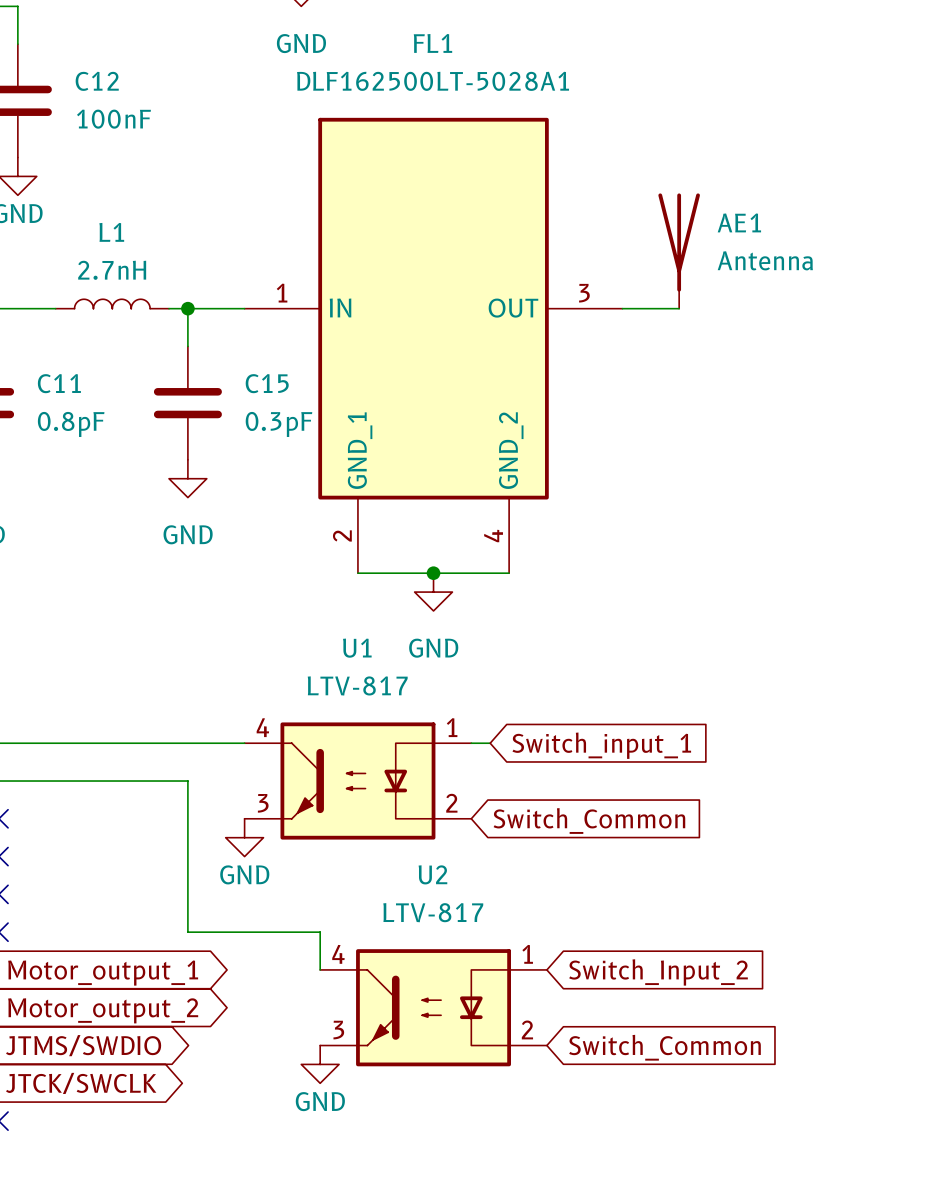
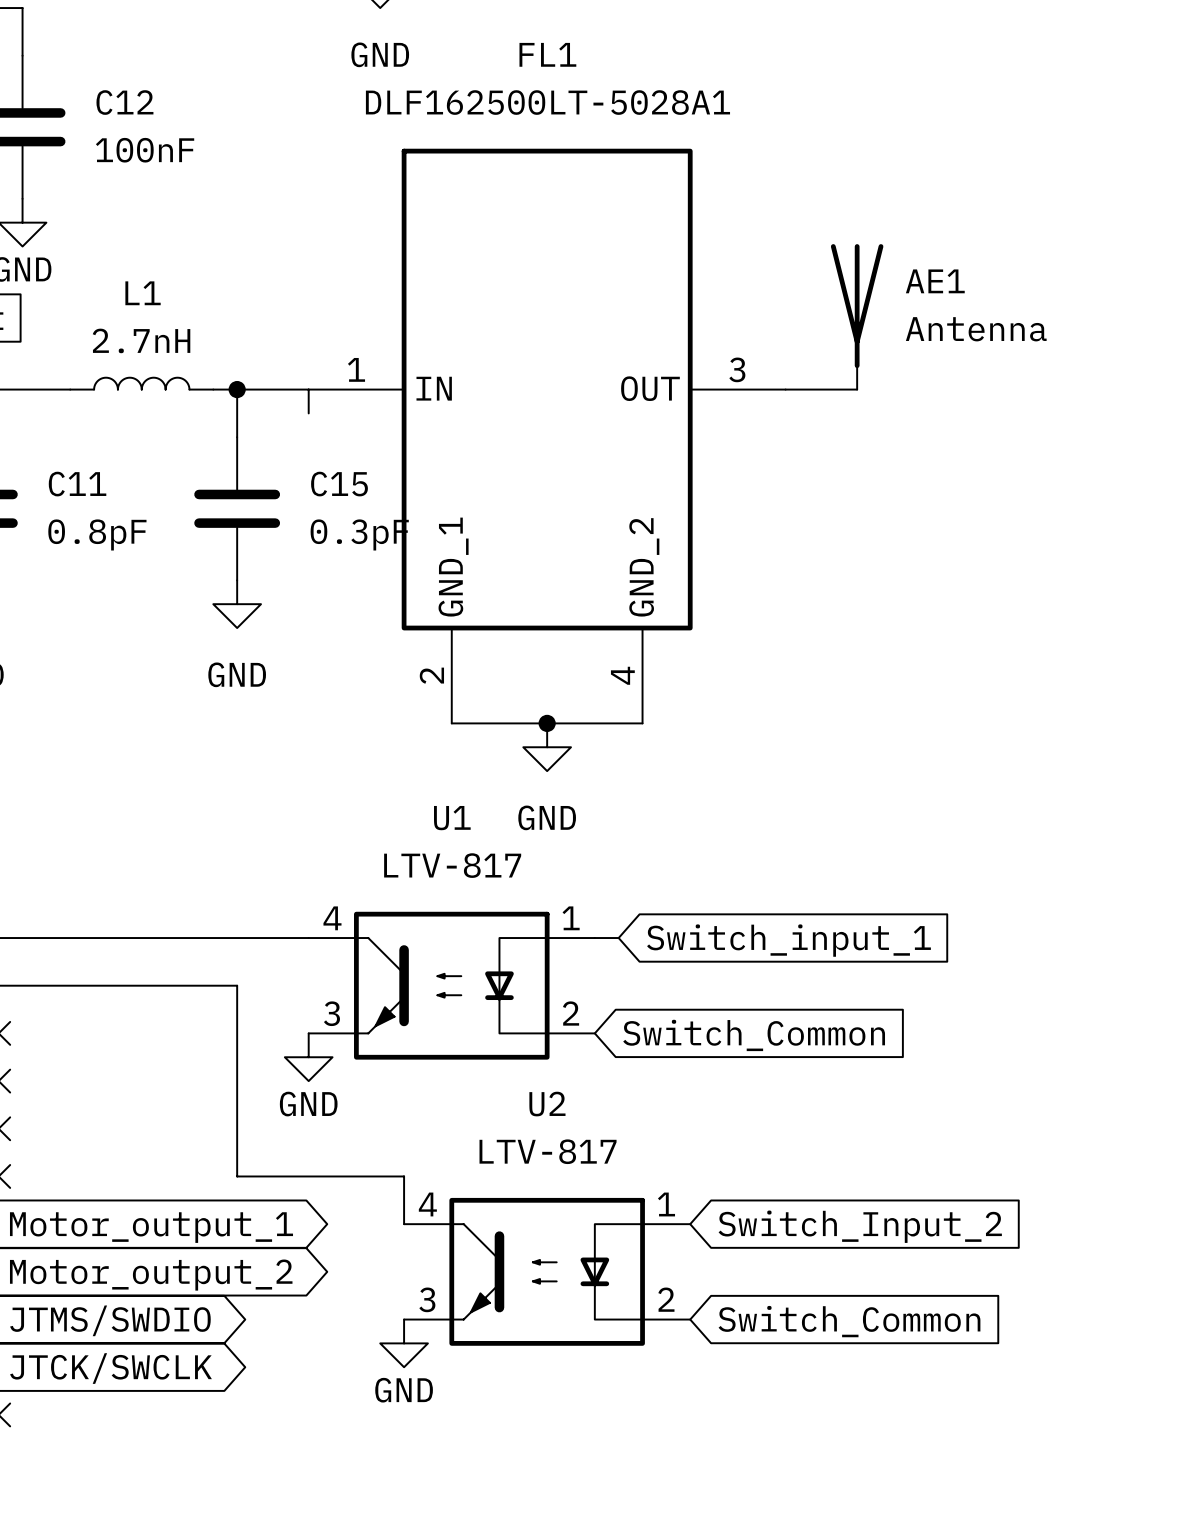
wire: none -> (308, 389) (308, 413)

